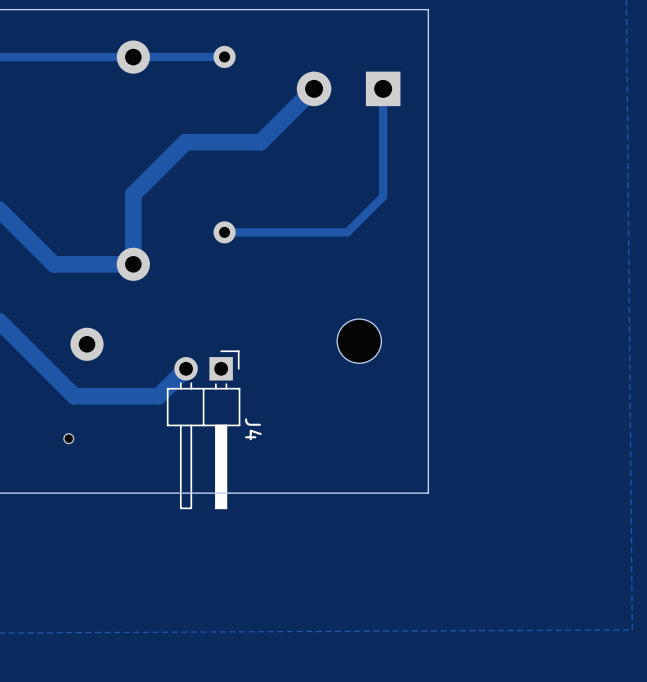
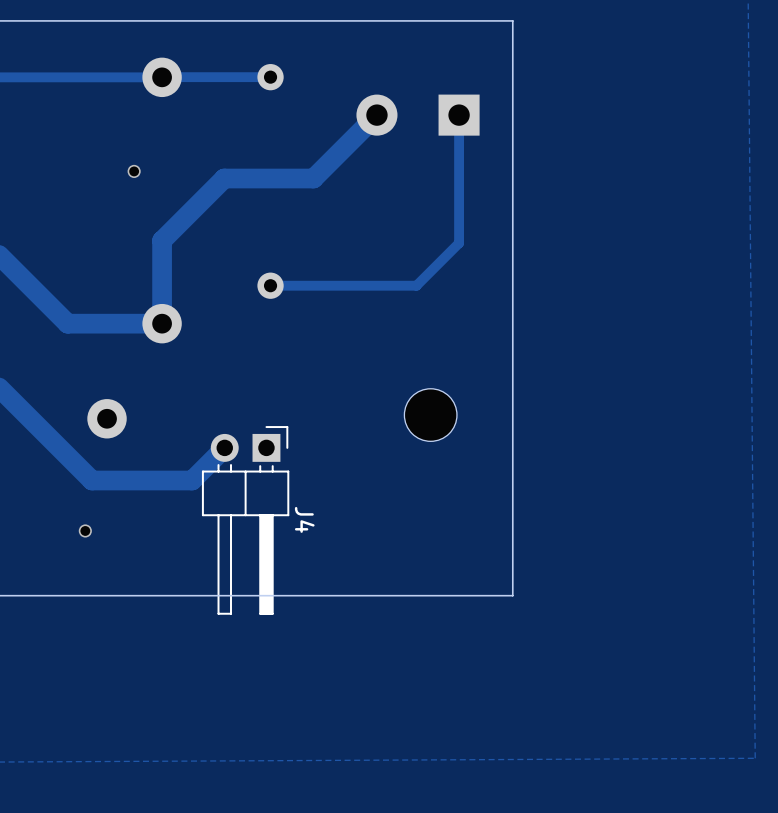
via: none -> (134, 171)

